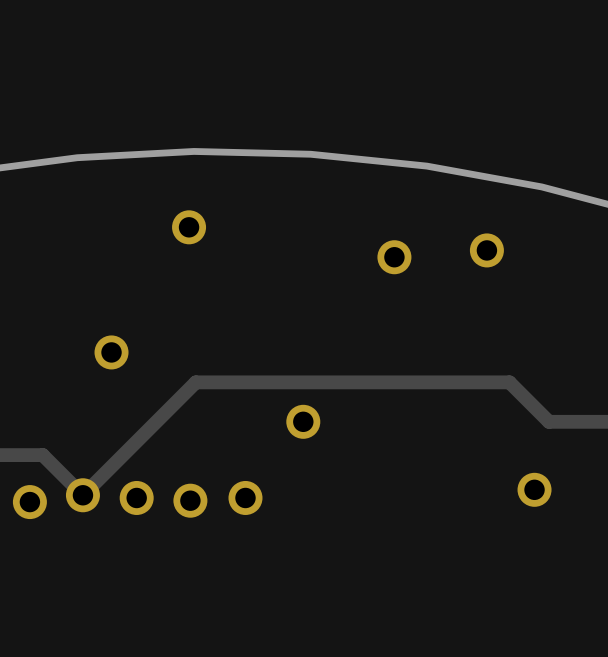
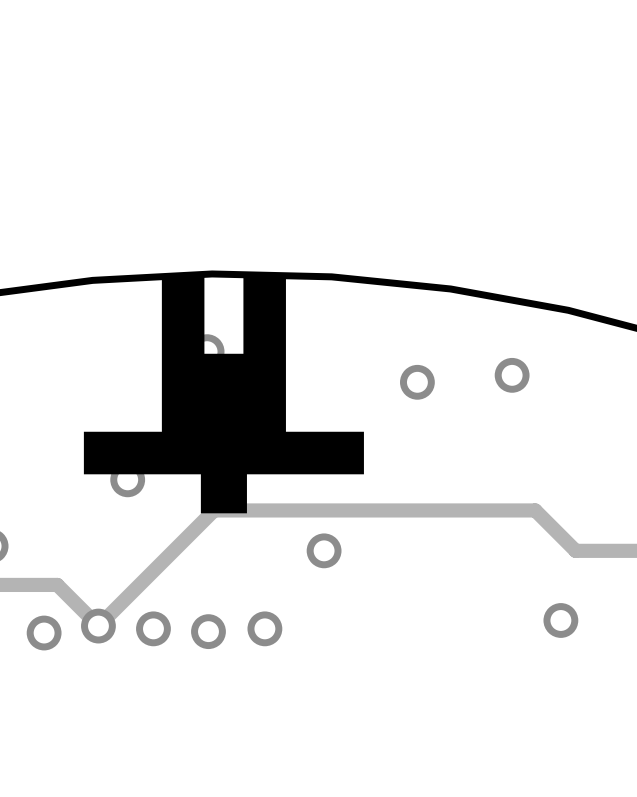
drawing: none -> [83, 275, 364, 514]

